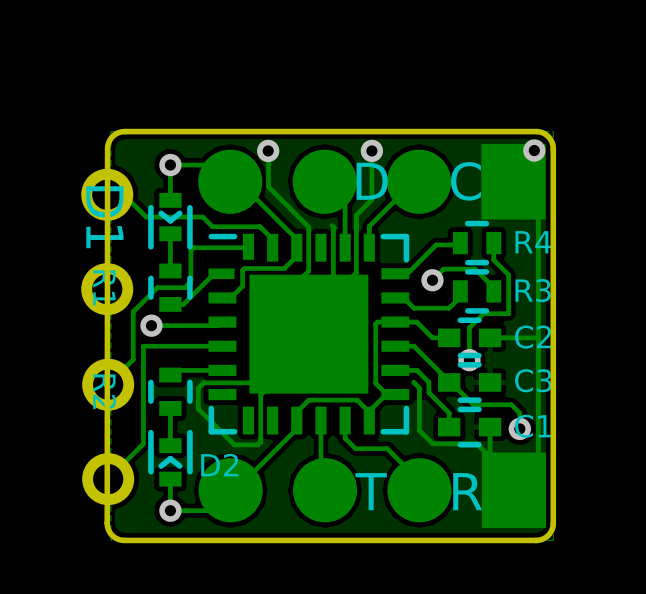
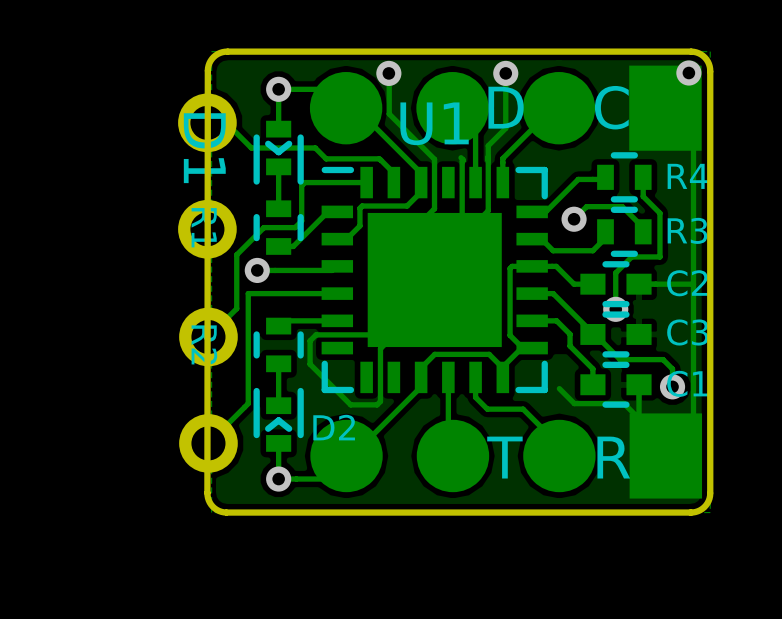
part: (308, 334) -> none
U1: none -> (434, 279)
track: (413, 382) (419, 388) (419, 430) -> none

